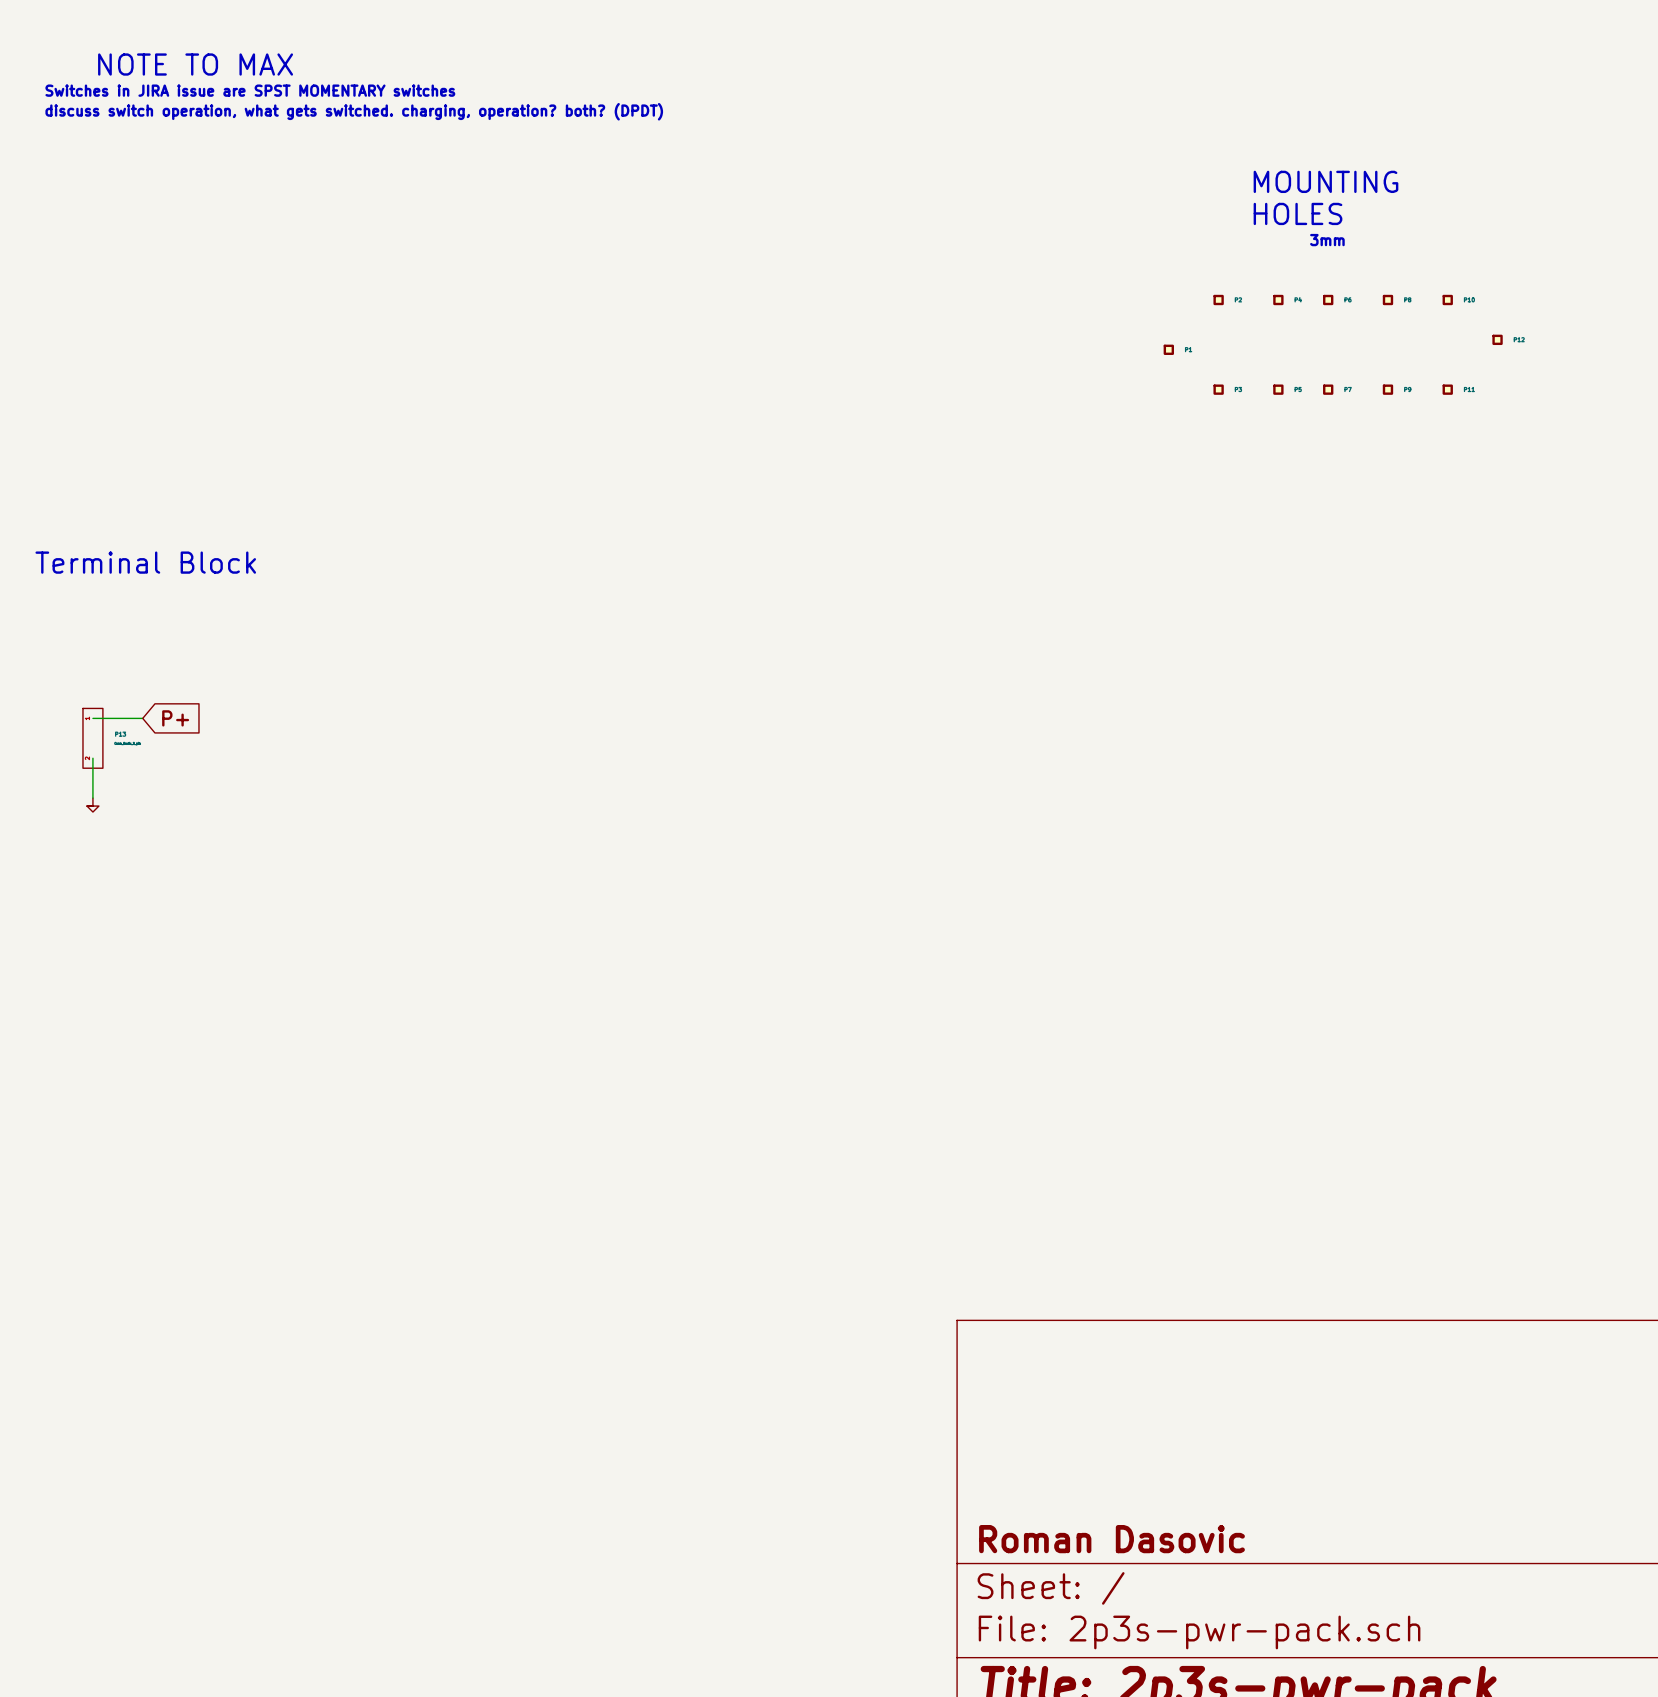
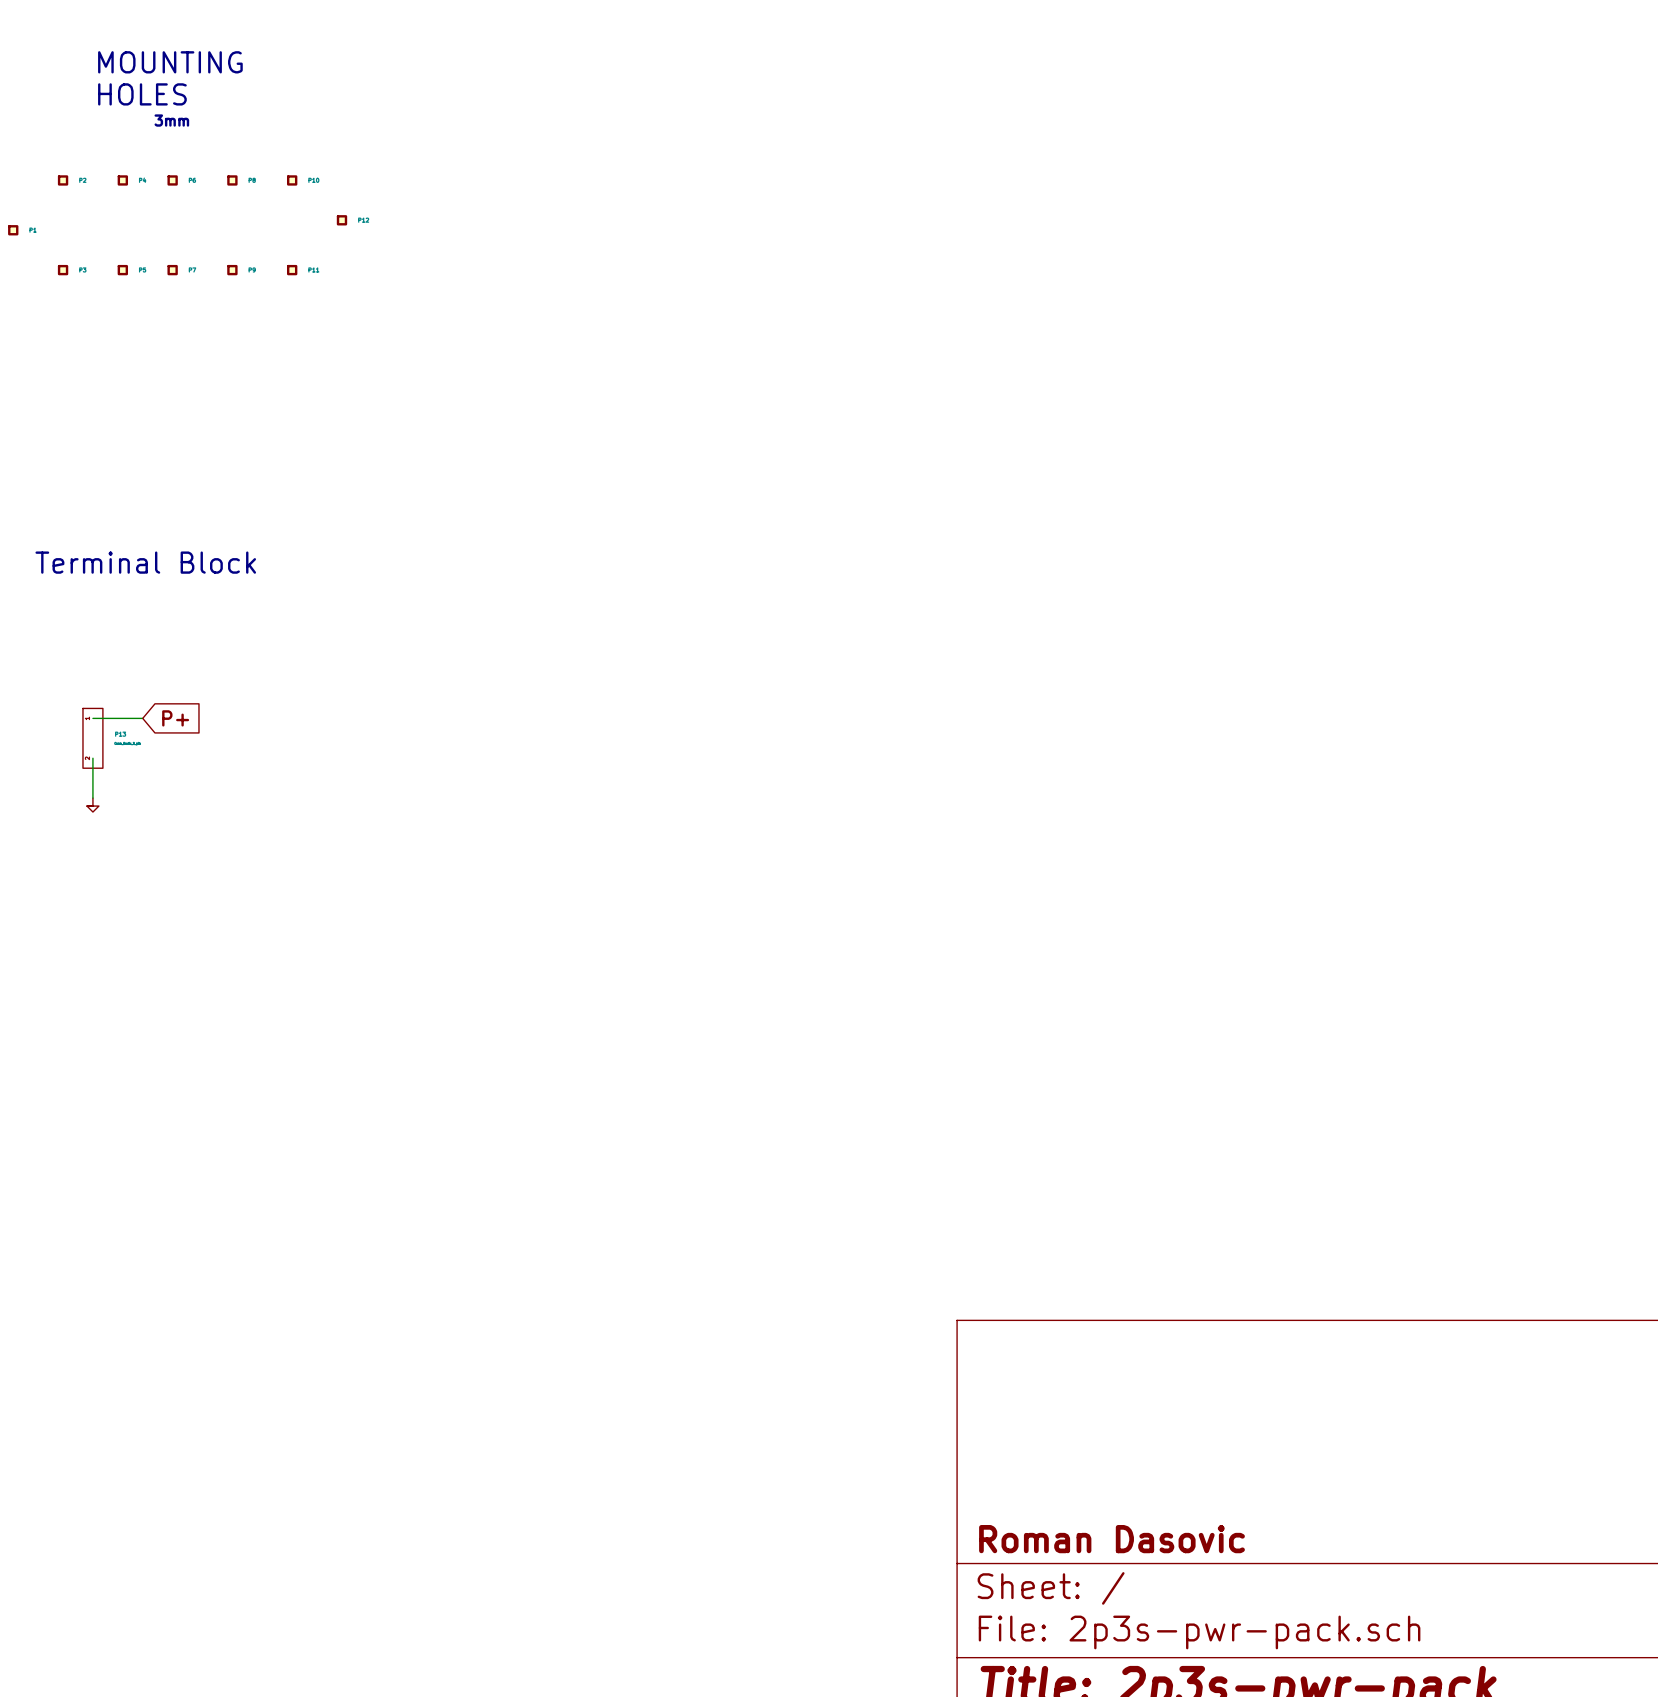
text: NOTE TO MAX (195, 64) -> MOUNTING (170, 62)
text: Switches in JIRA issue are SPST MOMENTARY switches (250, 90) -> none
text: none -> HOLES (142, 94)
text: discuss switch operation, what gets switched. charging, operation? both? (DPDT) (354, 111) -> none
text: none -> 3mm (171, 120)
text: MOUNTING (1325, 181) -> none
text: HOLES (1297, 213) -> none
text: 3mm (1327, 240) -> none
part position: (1218, 300) -> (63, 180)
part position: (1278, 300) -> (122, 180)
part position: (1328, 300) -> (172, 180)
part position: (1387, 300) -> (232, 180)
part position: (1447, 300) -> (292, 180)
part position: (1497, 339) -> (341, 220)
part position: (1168, 349) -> (13, 230)
part position: (1218, 389) -> (63, 270)
part position: (1278, 389) -> (122, 270)
part position: (1328, 389) -> (172, 270)
part position: (1387, 389) -> (232, 270)
part position: (1447, 389) -> (292, 270)

